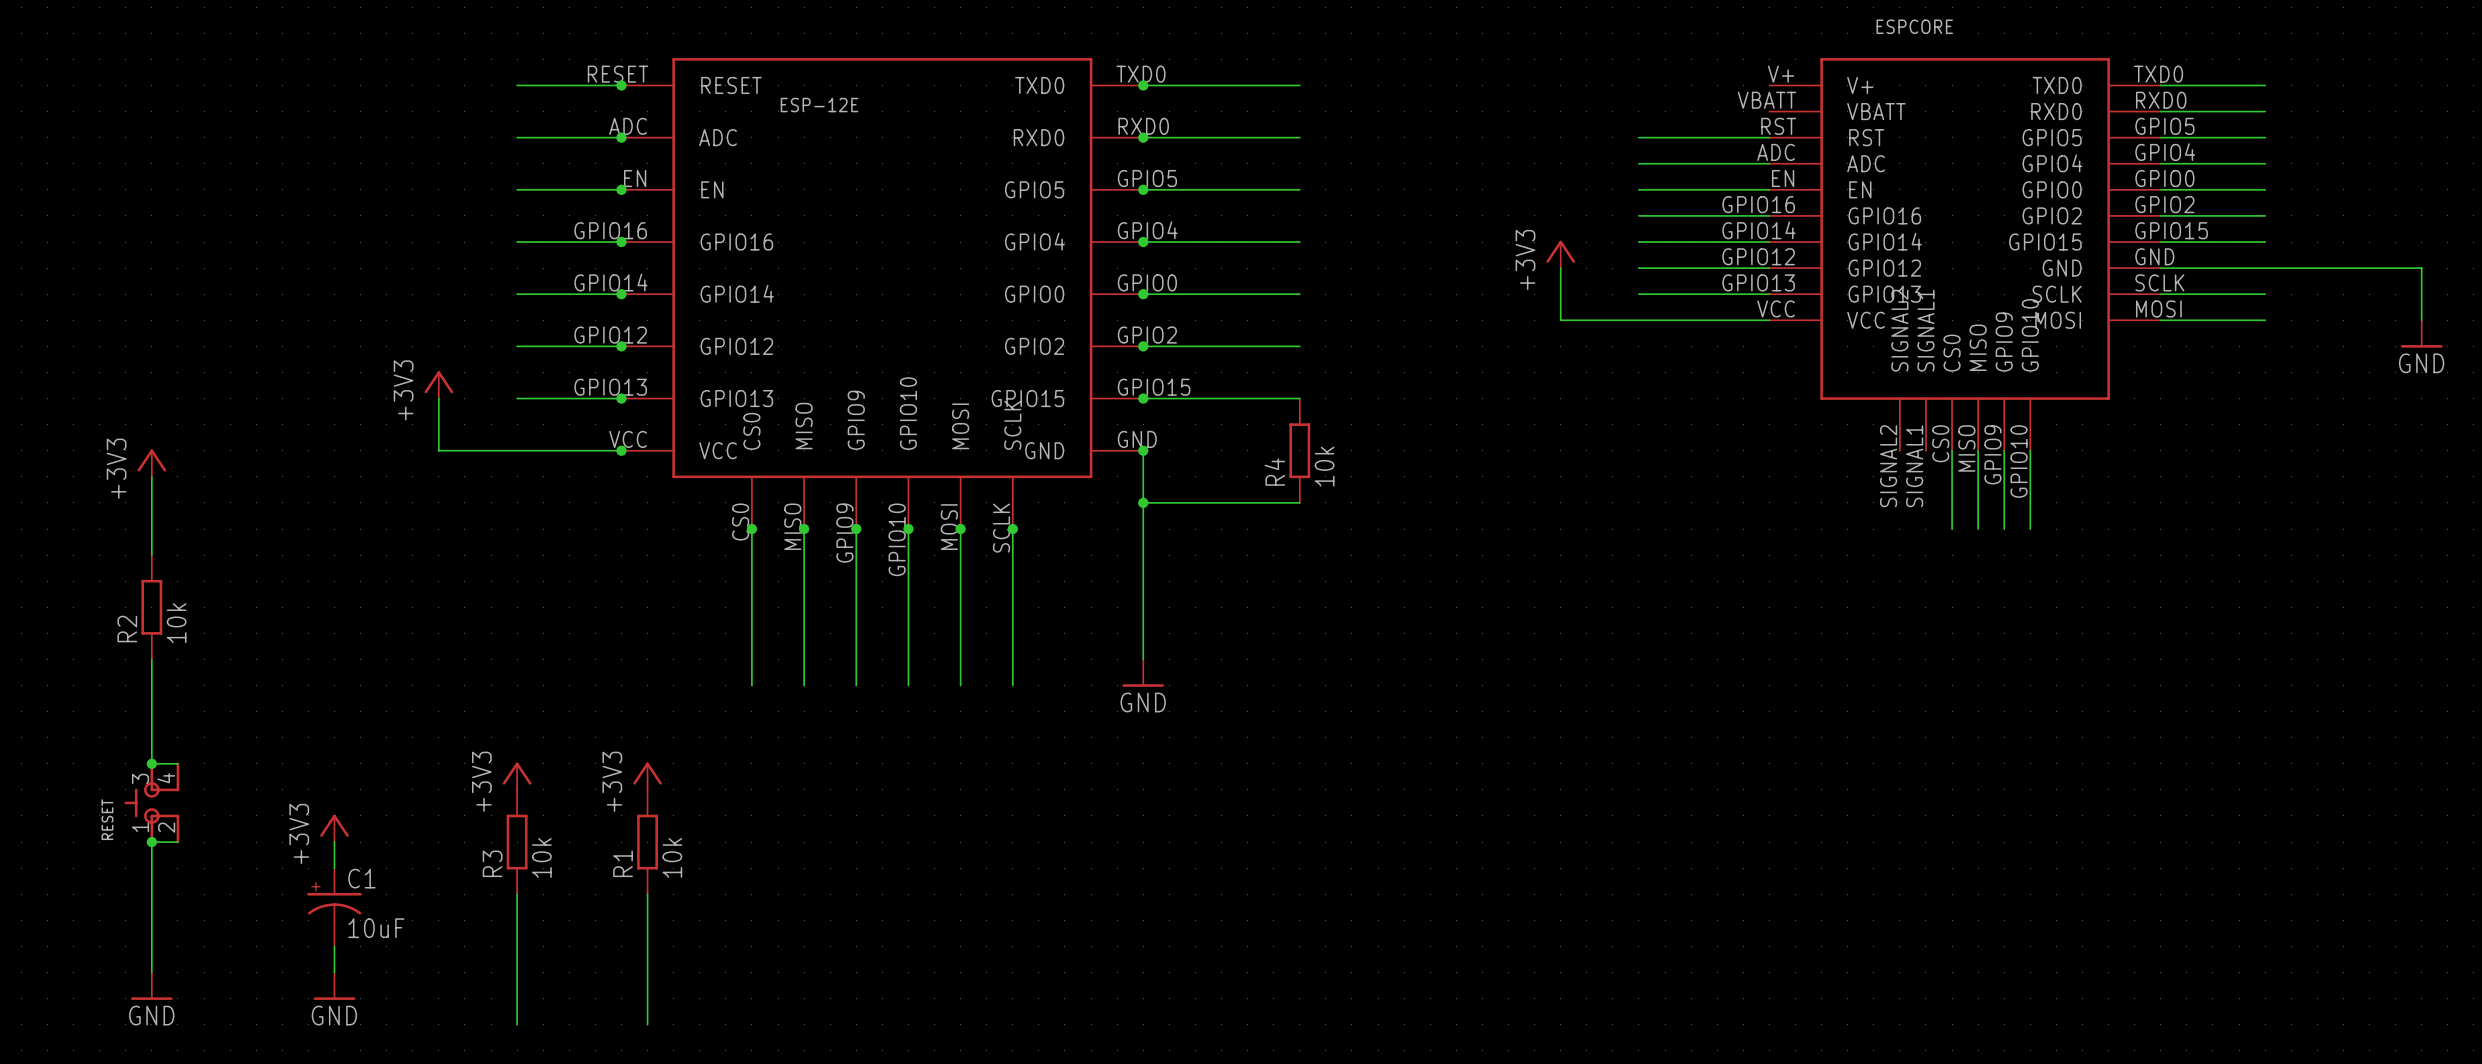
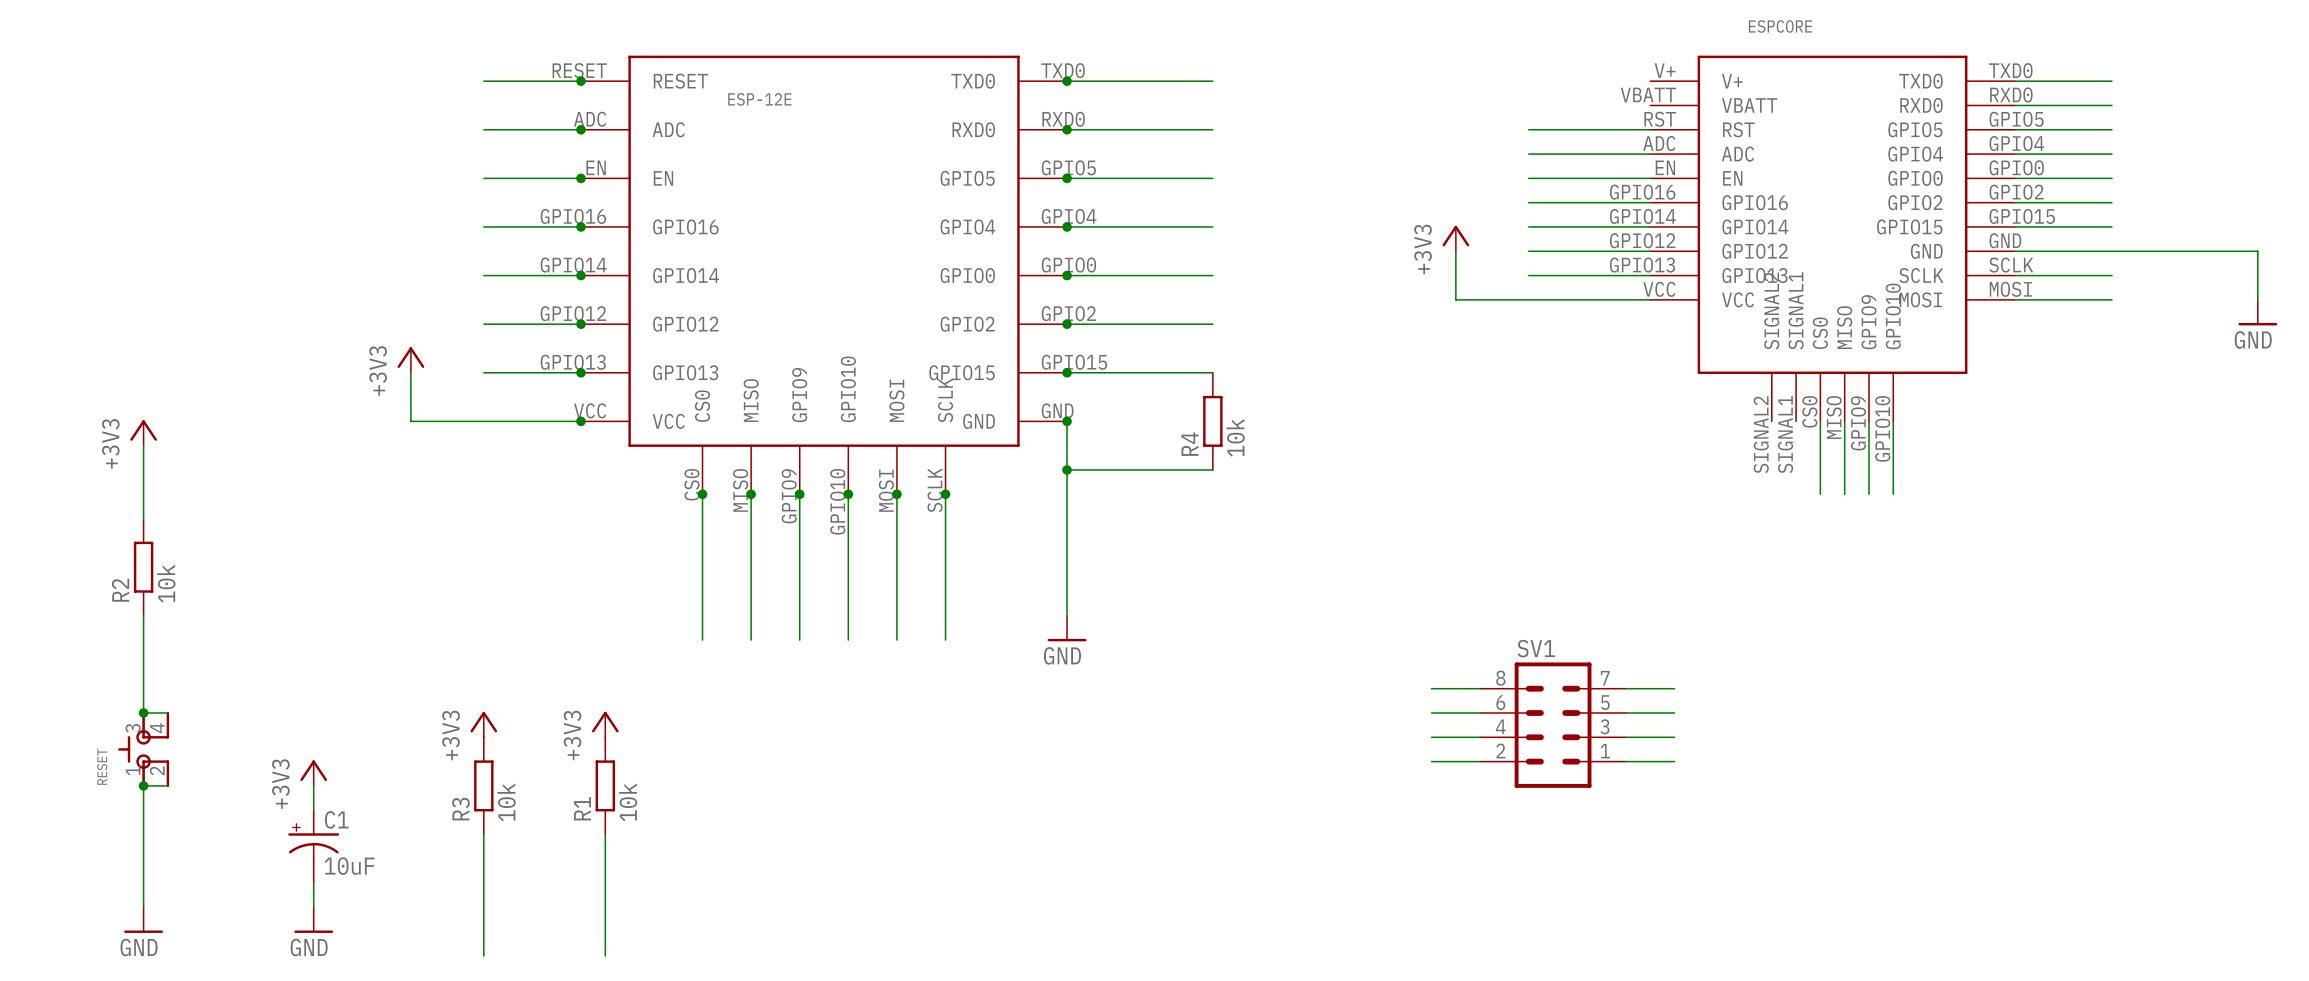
wire: none -> (1431, 688) (1480, 688)
wire: none -> (1625, 688) (1674, 688)
wire: none -> (1431, 713) (1480, 713)
wire: none -> (1625, 713) (1674, 713)
SV1: none -> (1553, 725)
wire: none -> (1431, 737) (1480, 737)
wire: none -> (1625, 737) (1674, 737)
wire: none -> (1431, 761) (1480, 761)
wire: none -> (1625, 761) (1674, 761)

